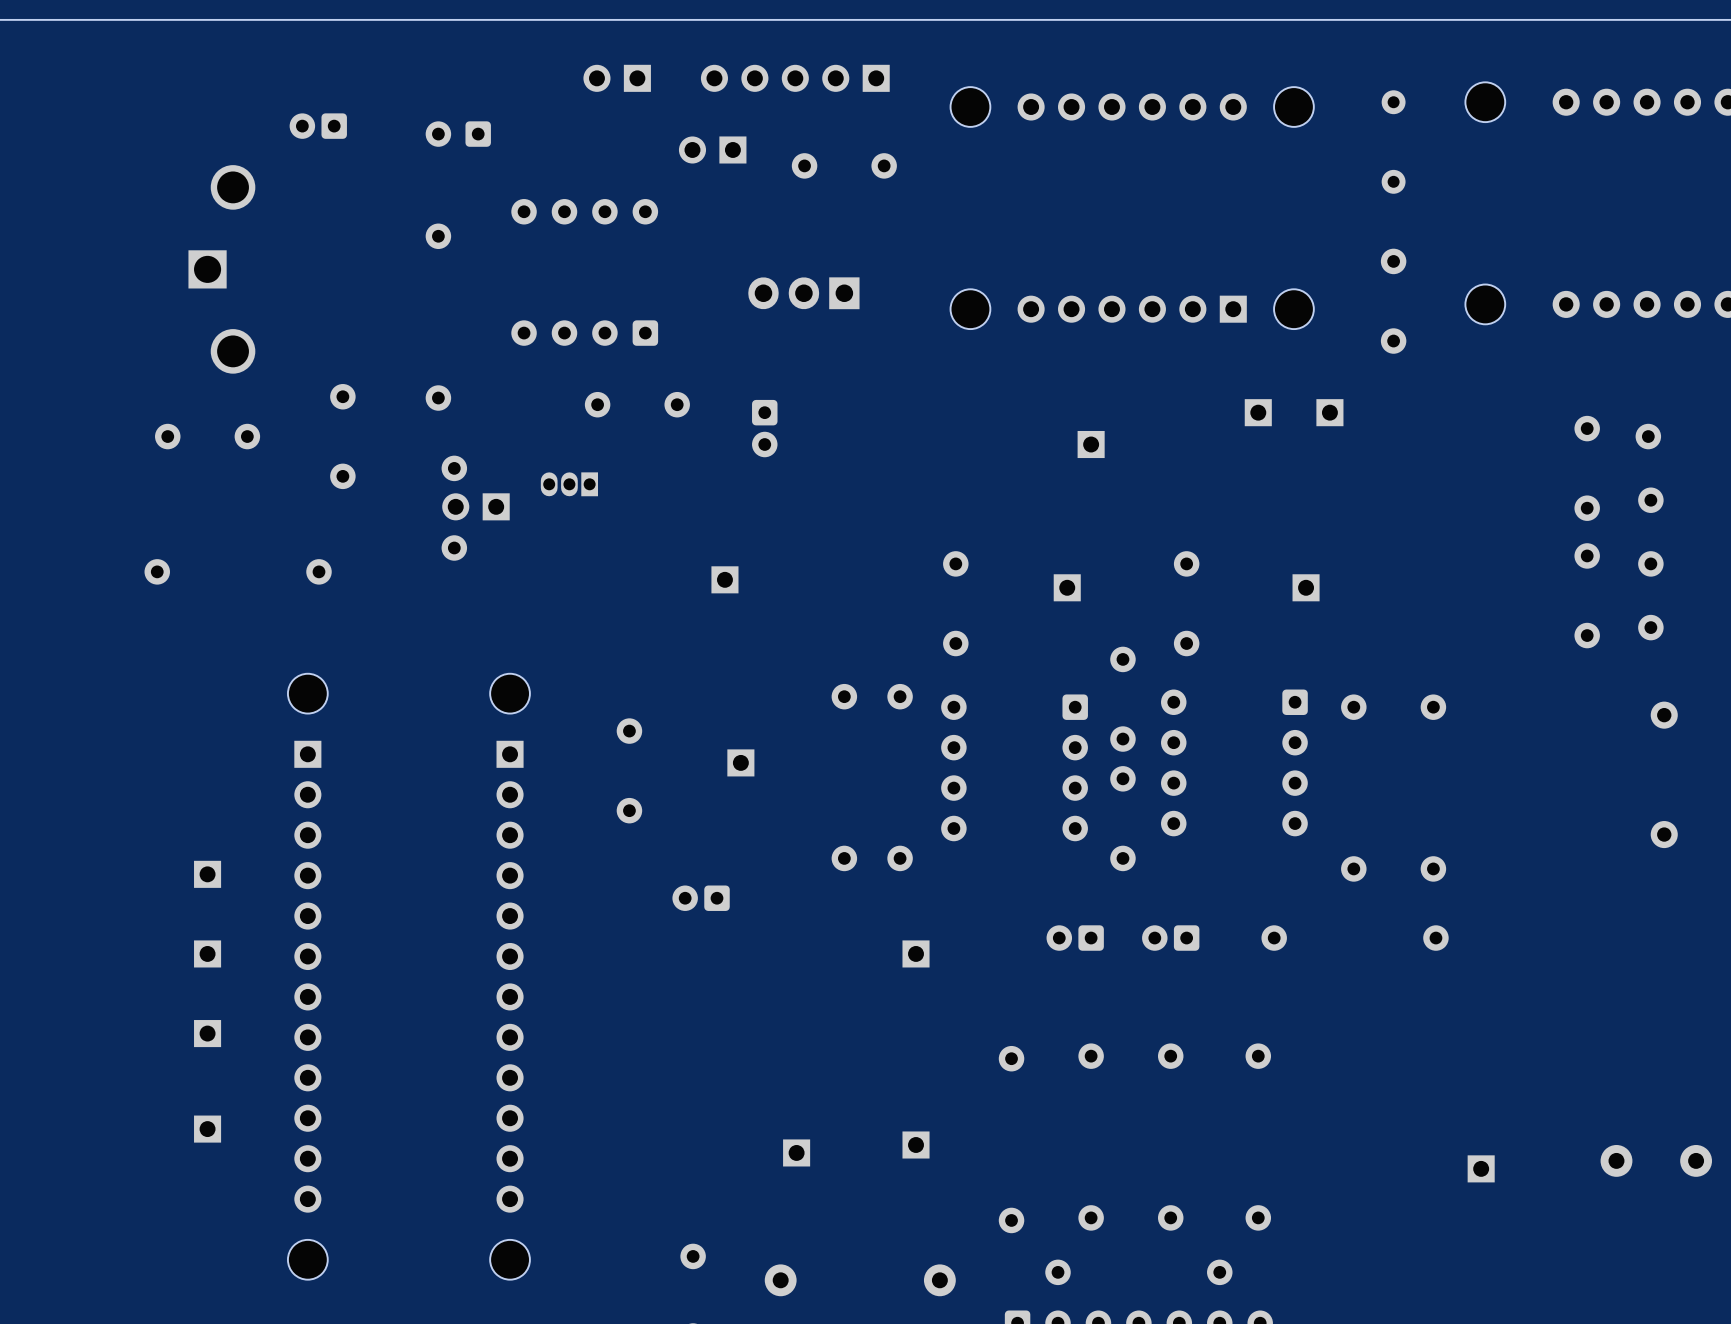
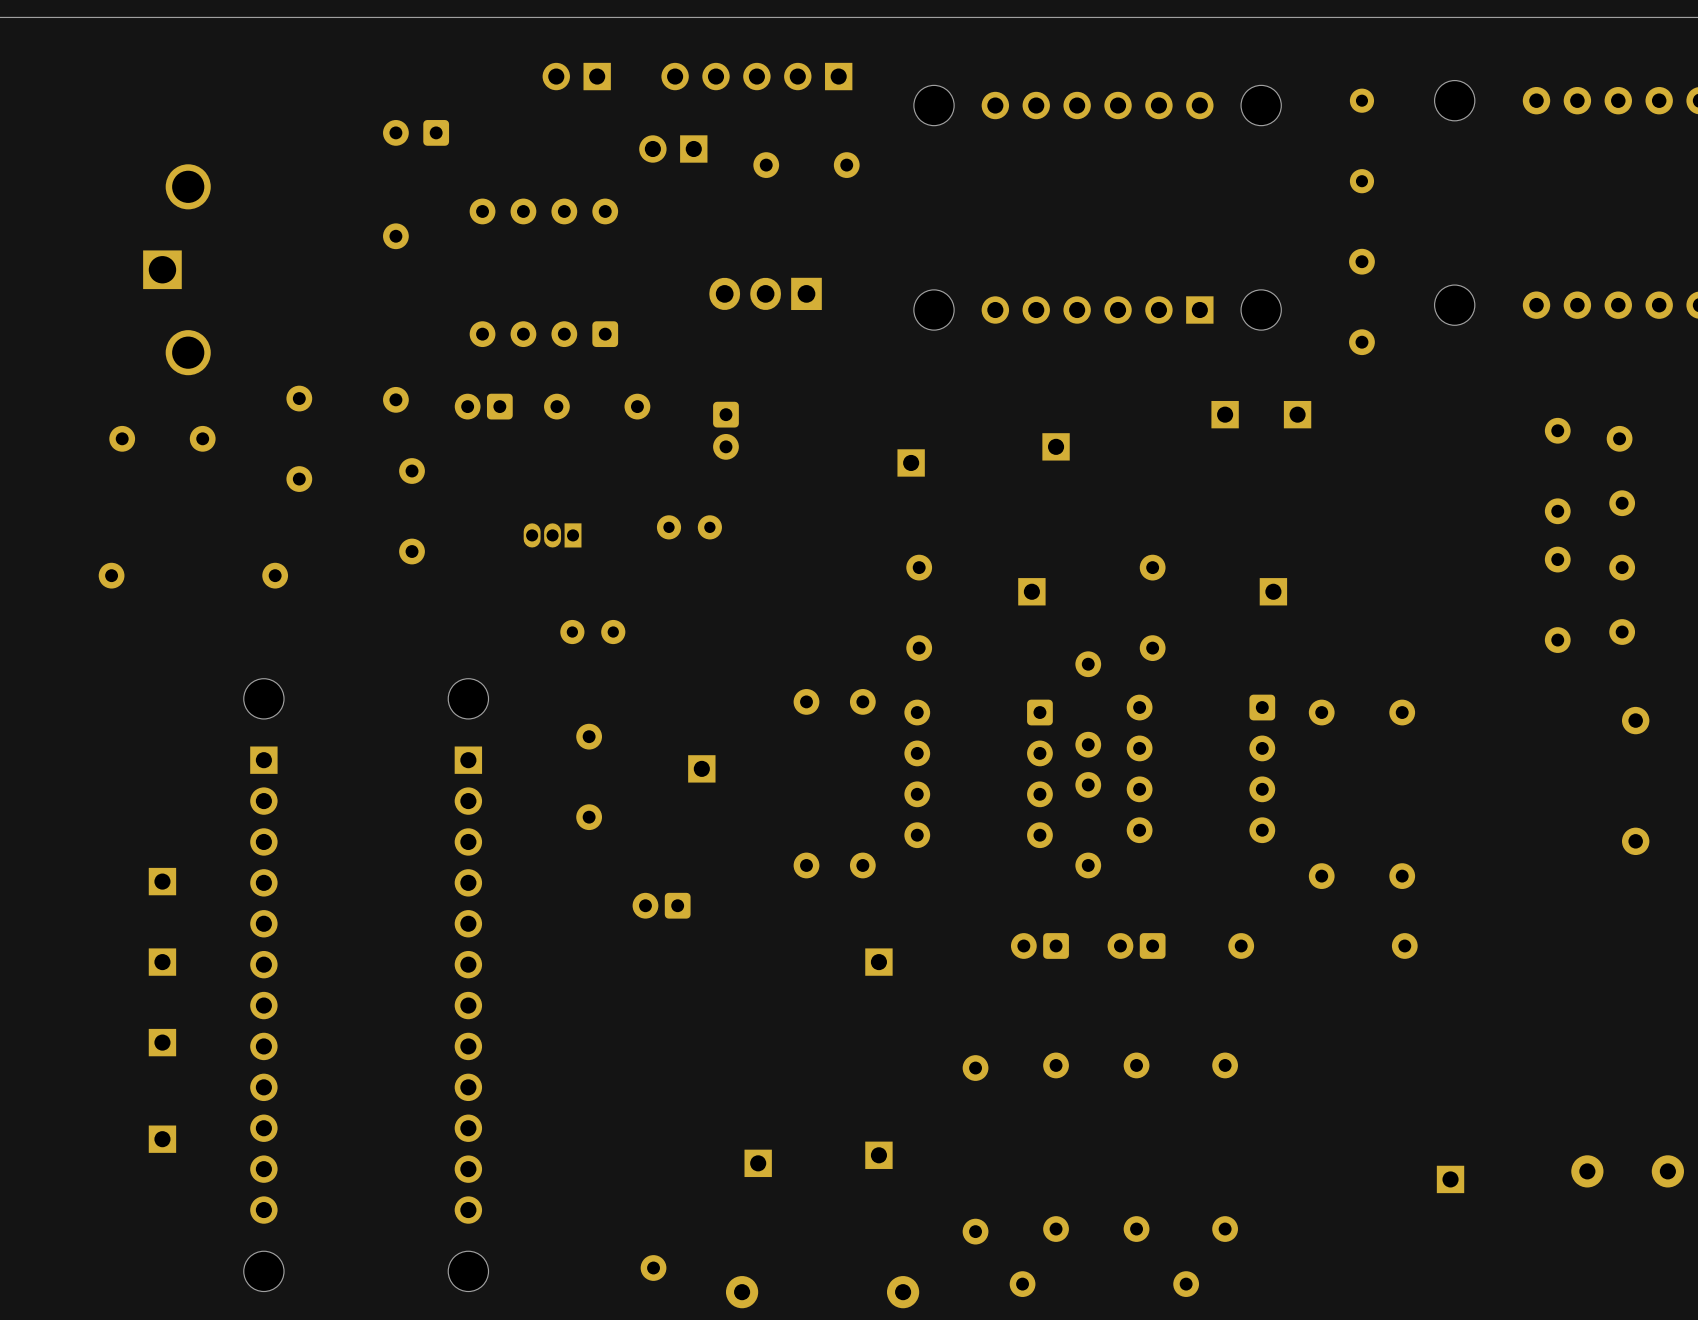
part position: (318, 126) -> (483, 406)
part position: (569, 484) -> (552, 535)
part: (475, 506) -> none
part: none -> (689, 527)
part position: (724, 579) -> (911, 462)
part: none -> (592, 632)

